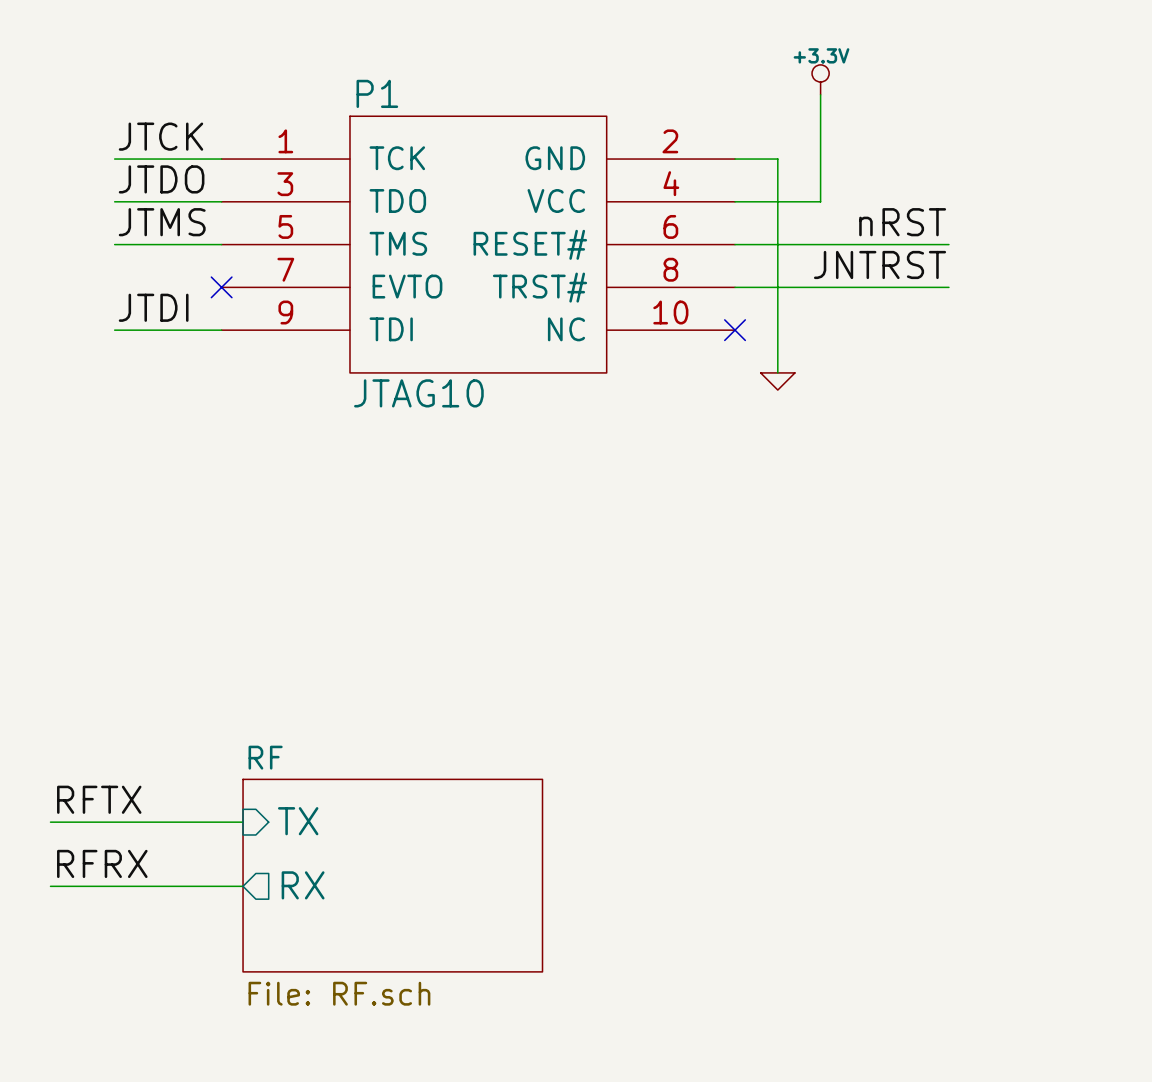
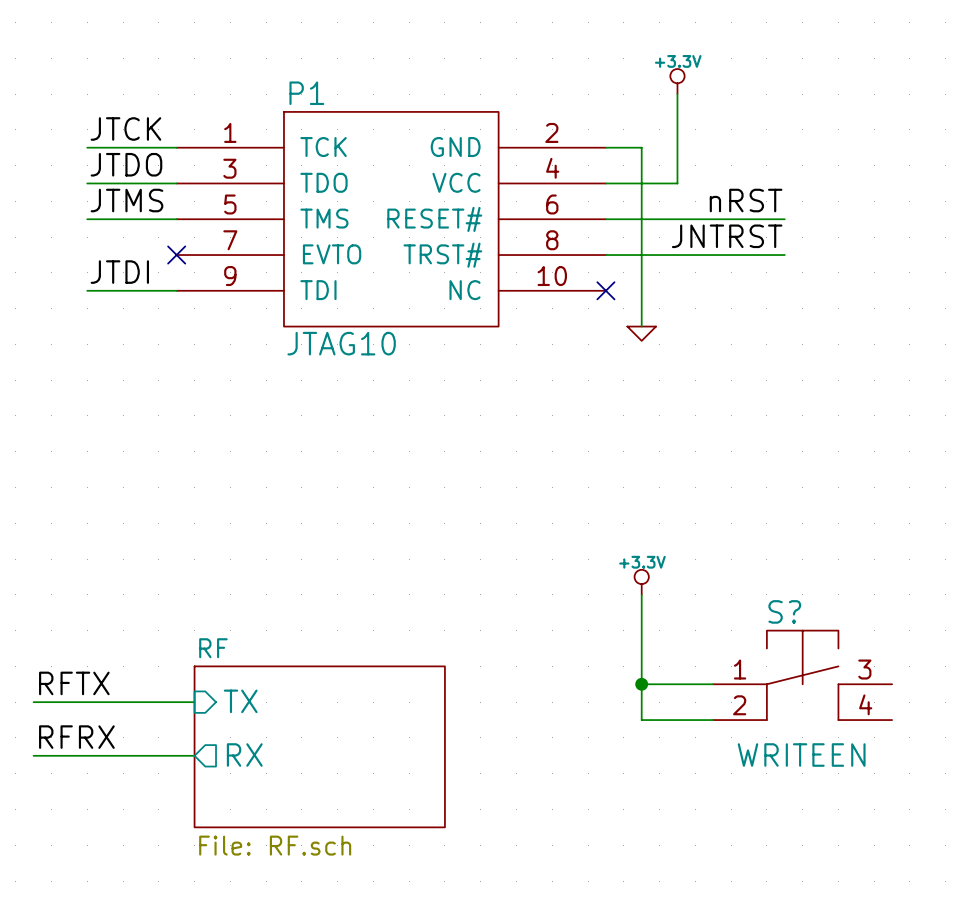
power symbol: none -> +3.3V (641, 582)
wire: none -> (641, 594) (641, 720) (713, 720)
S?: none -> WRITEEN (802, 675)
wire: none -> (641, 684) (713, 684)
junction: none -> (641, 684)

